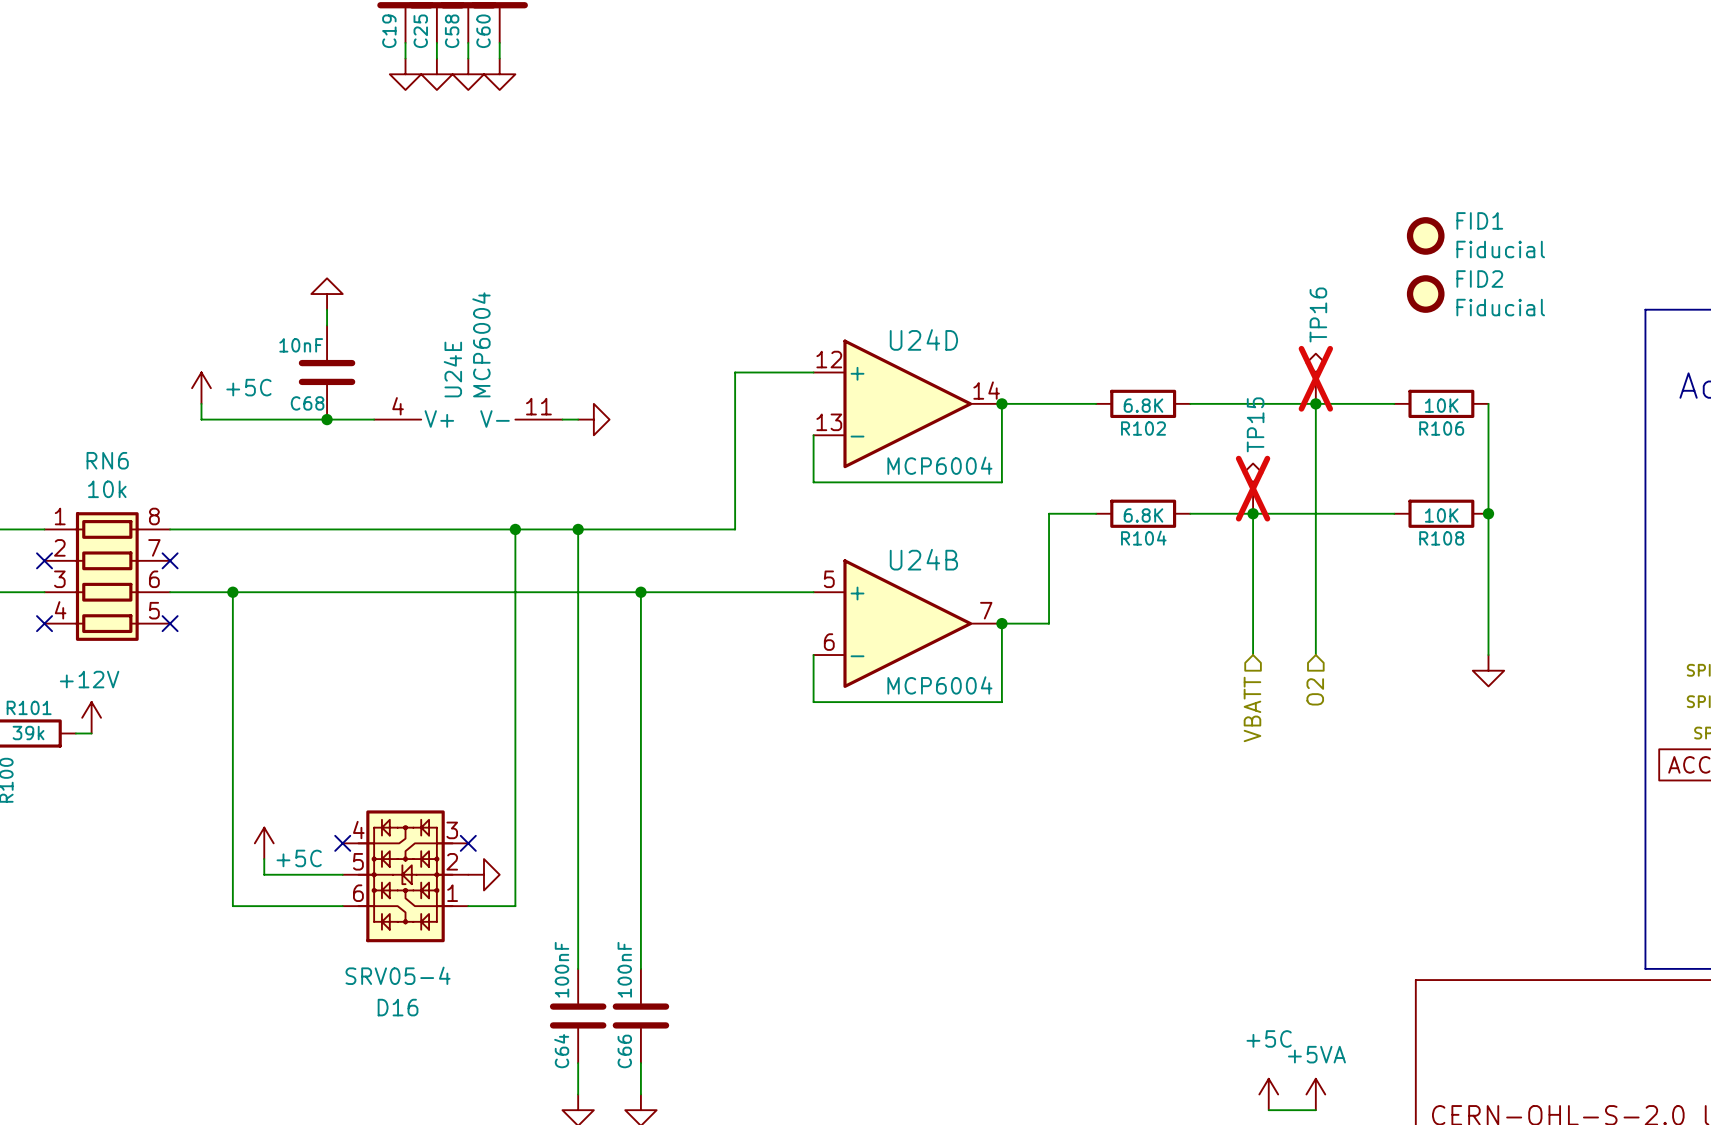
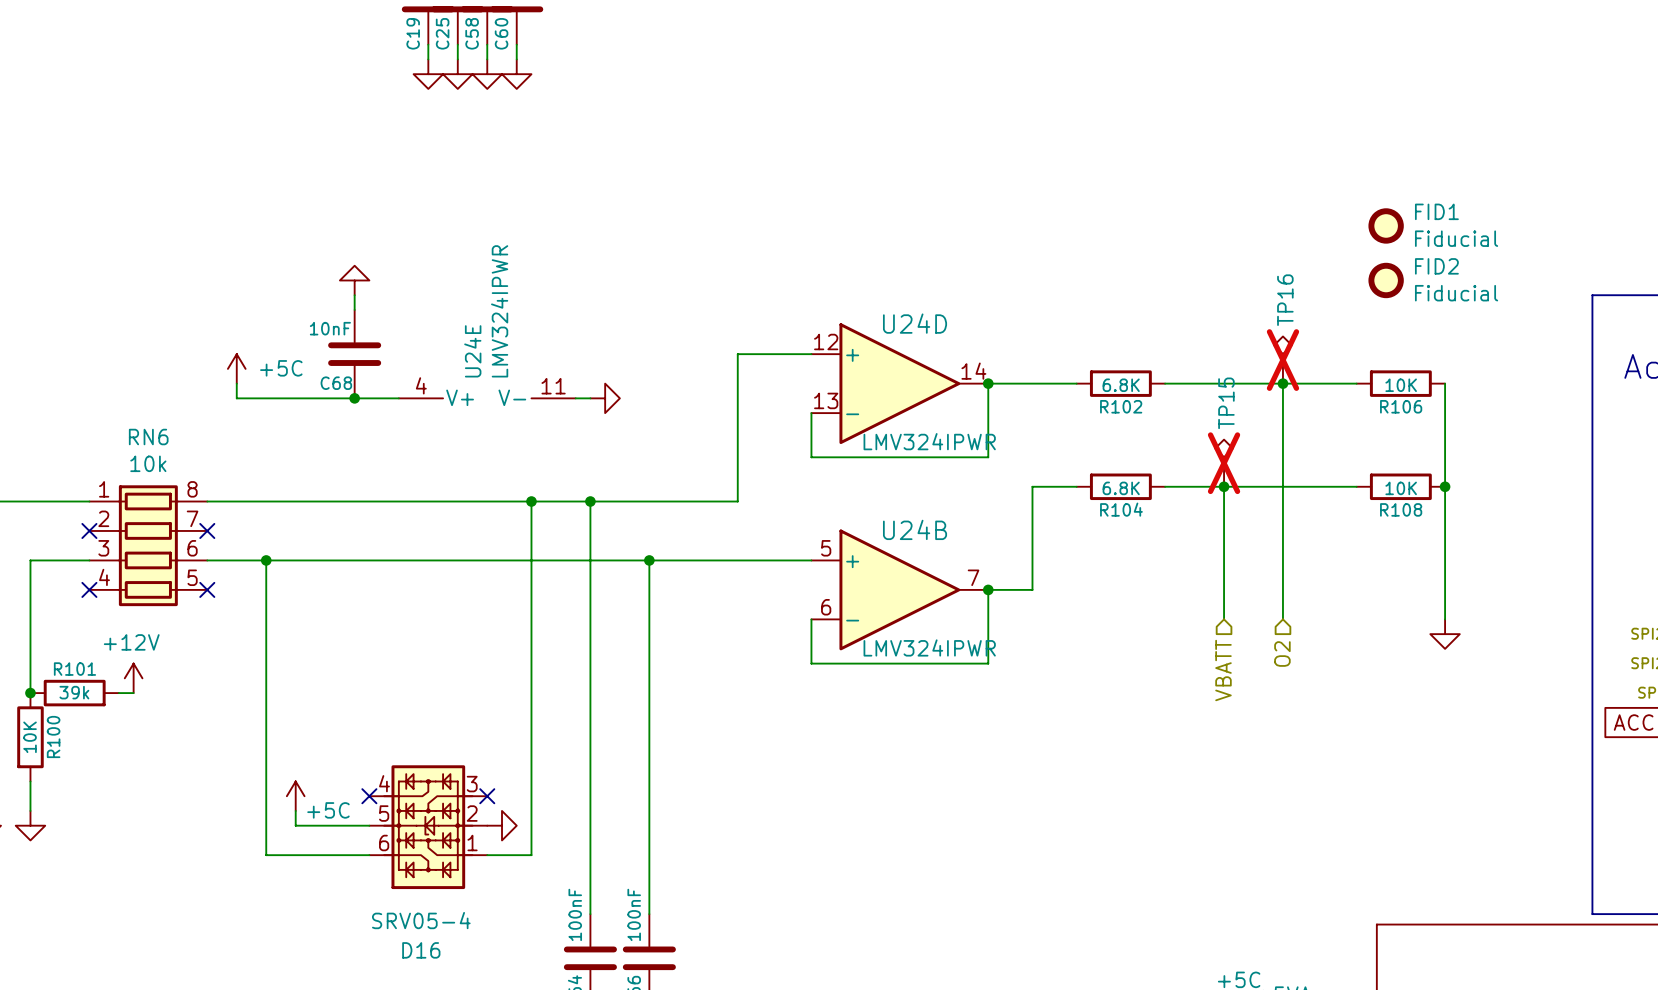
U24E value: MCP6004 (481, 344) -> LMV324IPWR (499, 311)
U24D value: MCP6004 (939, 465) -> LMV324IPWR (929, 441)
U24B value: MCP6004 (939, 685) -> LMV324IPWR (929, 647)

